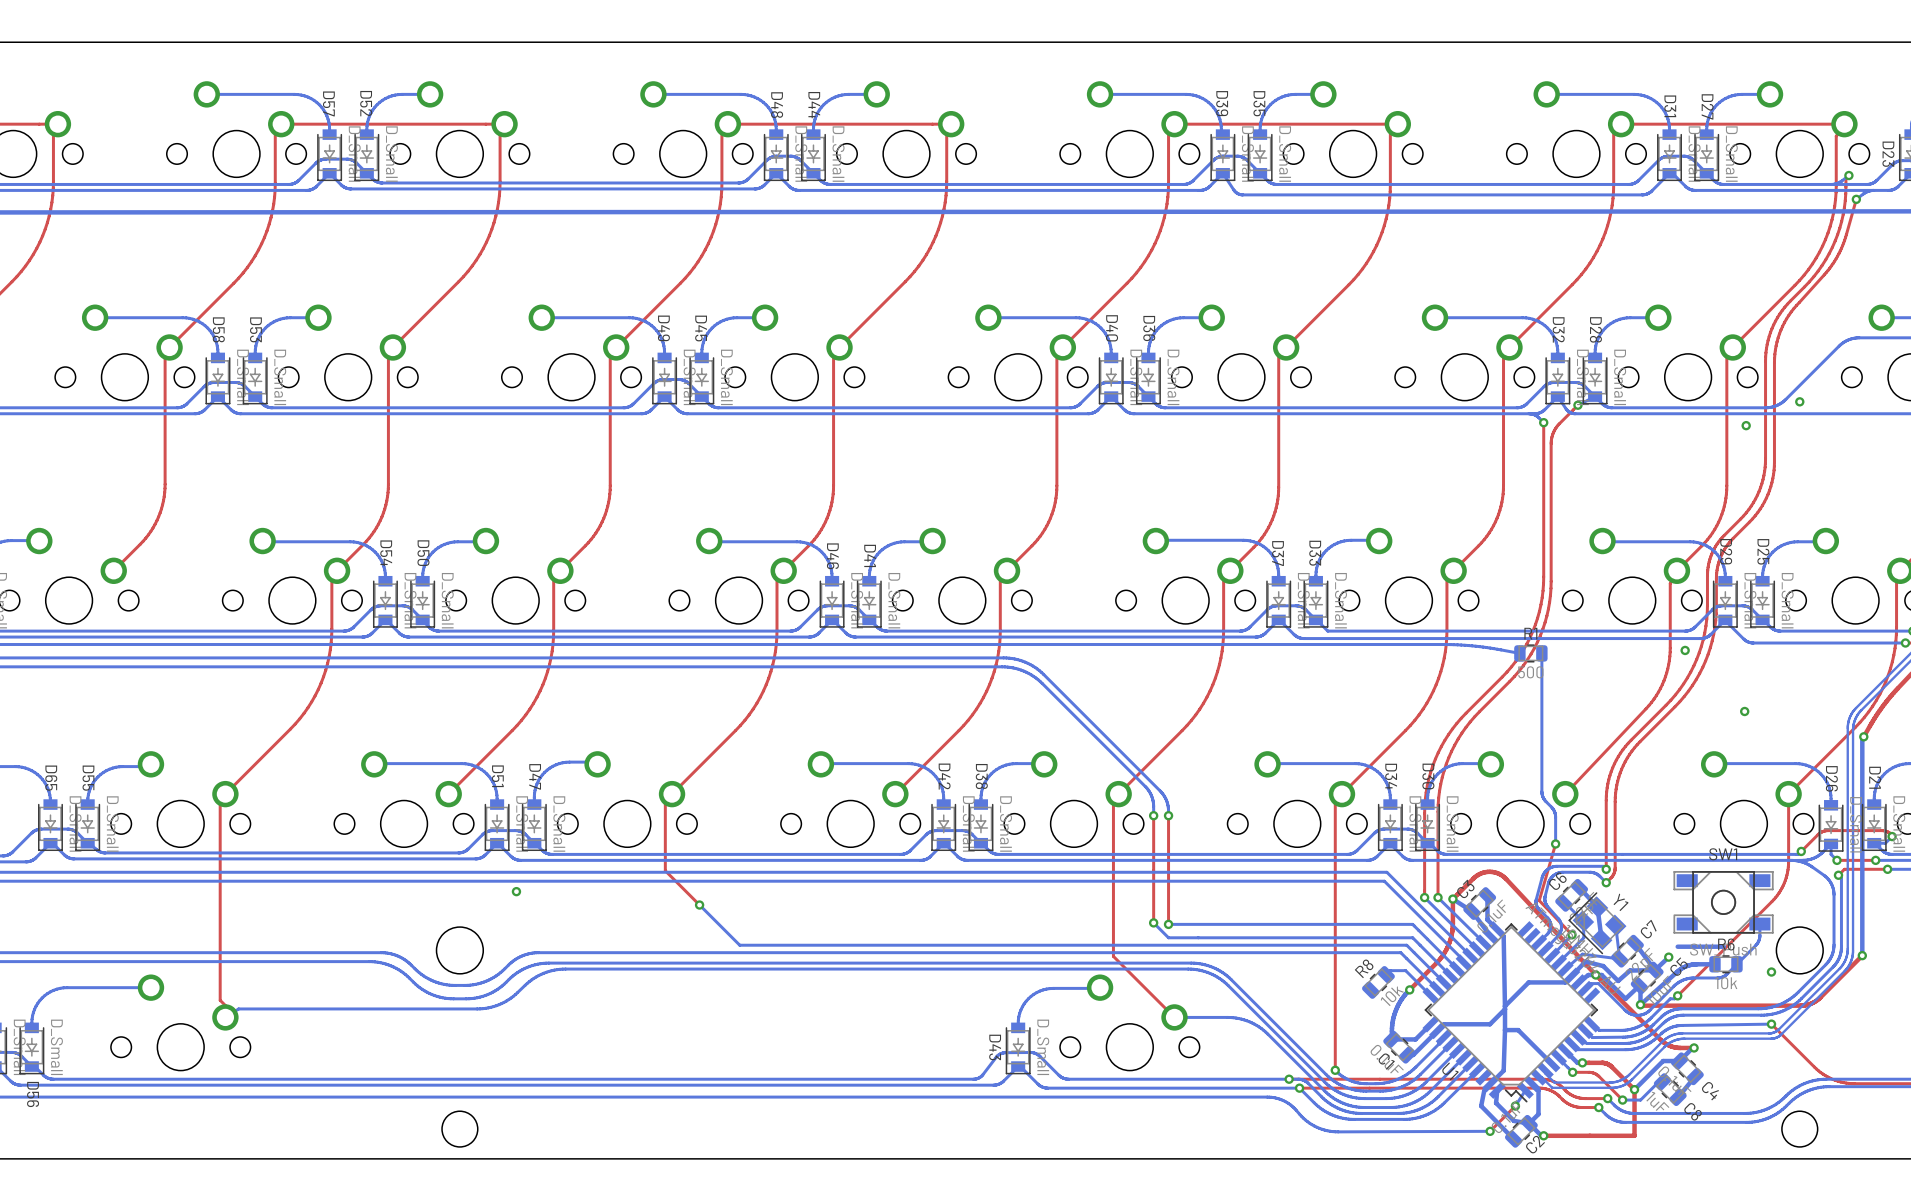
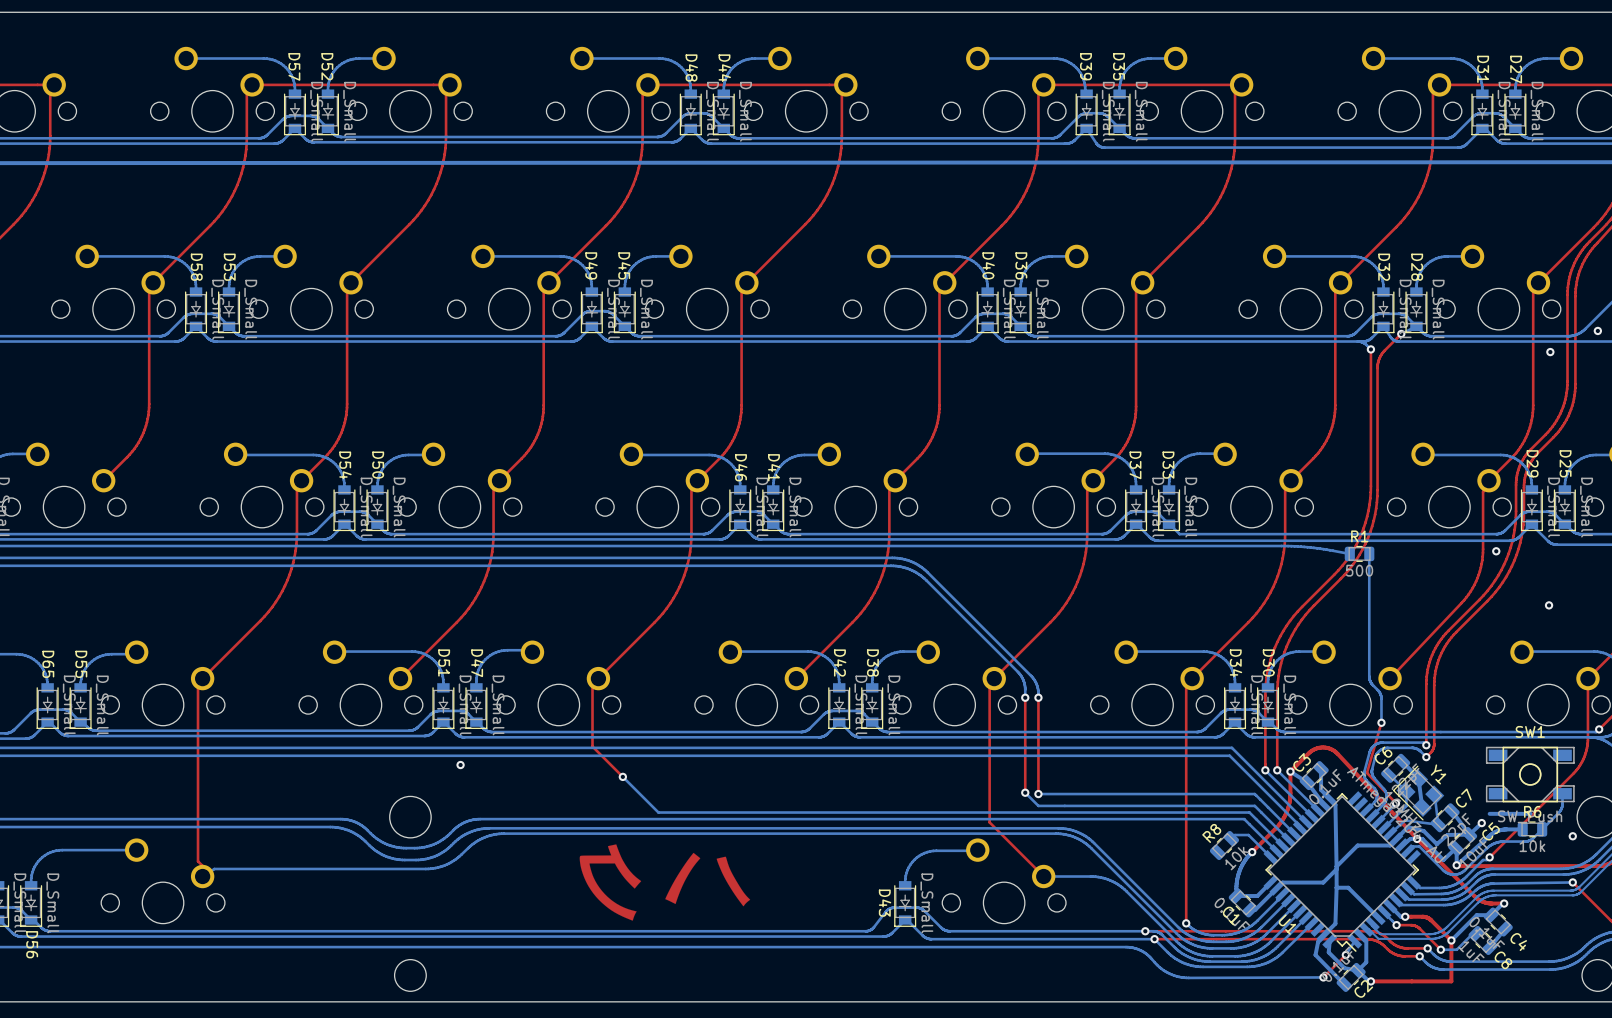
drawing: none -> [579, 844, 751, 921]

